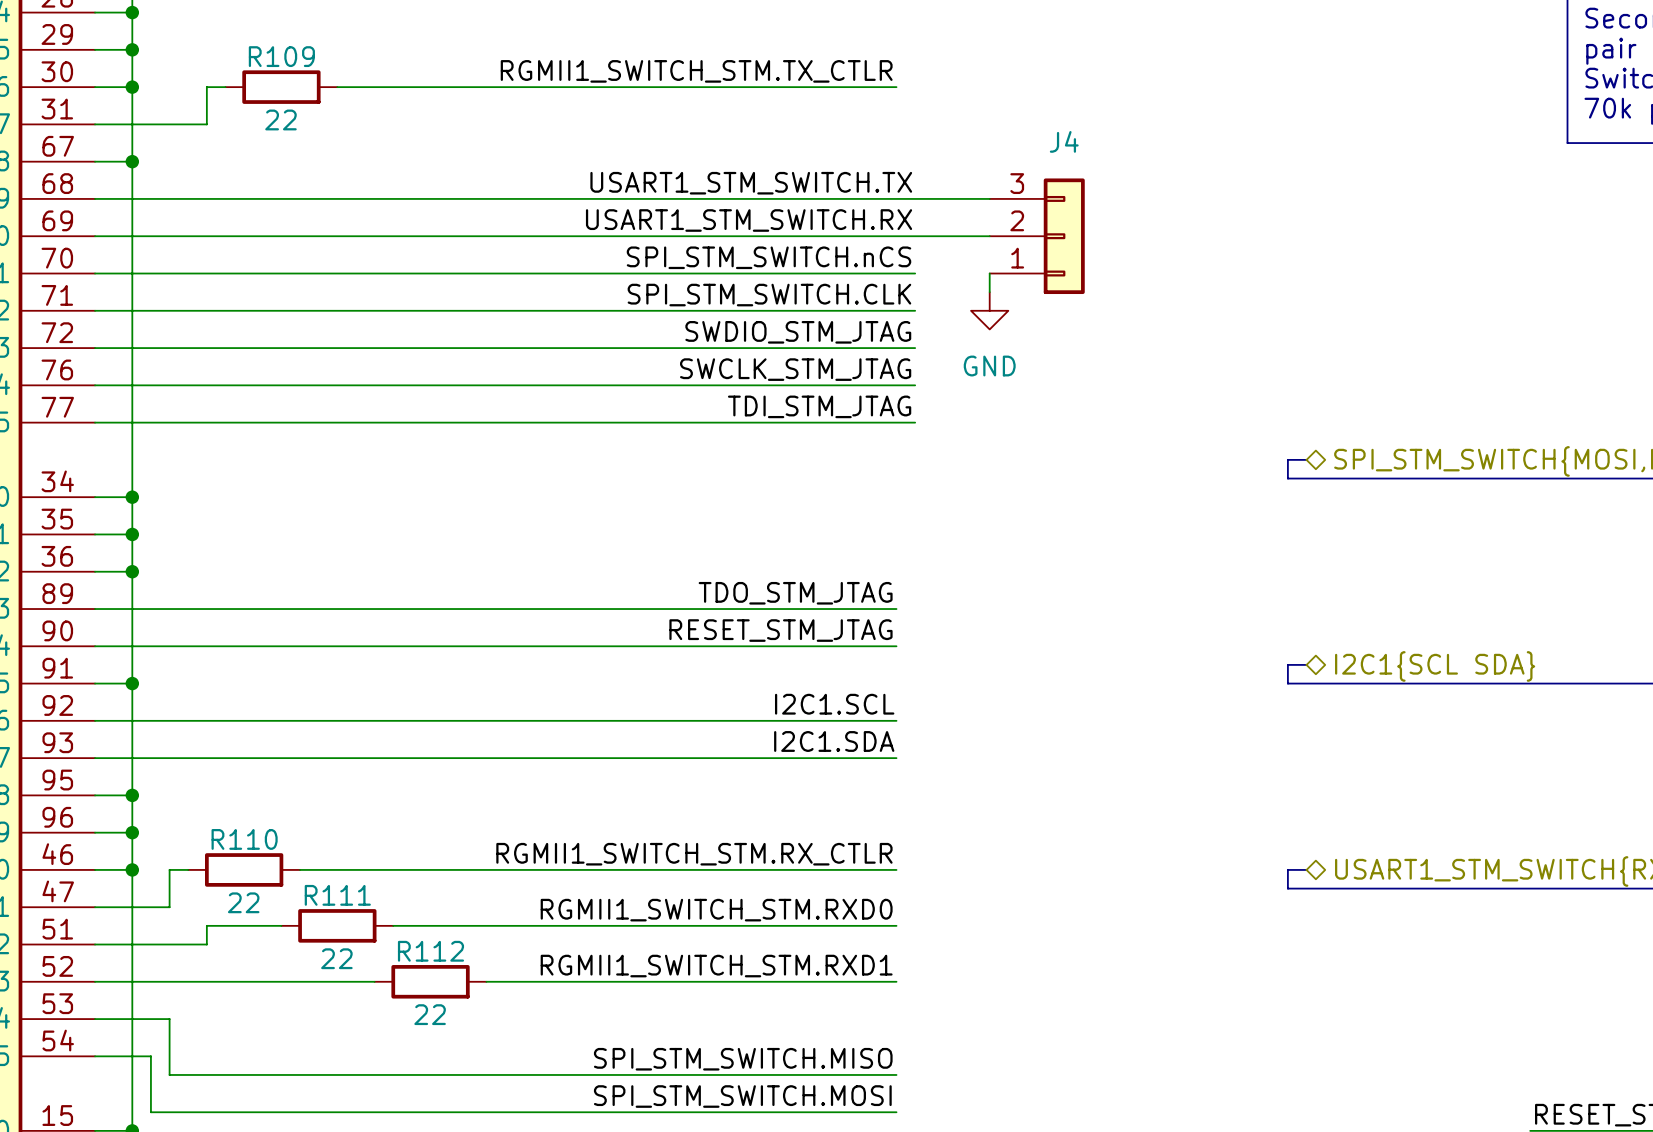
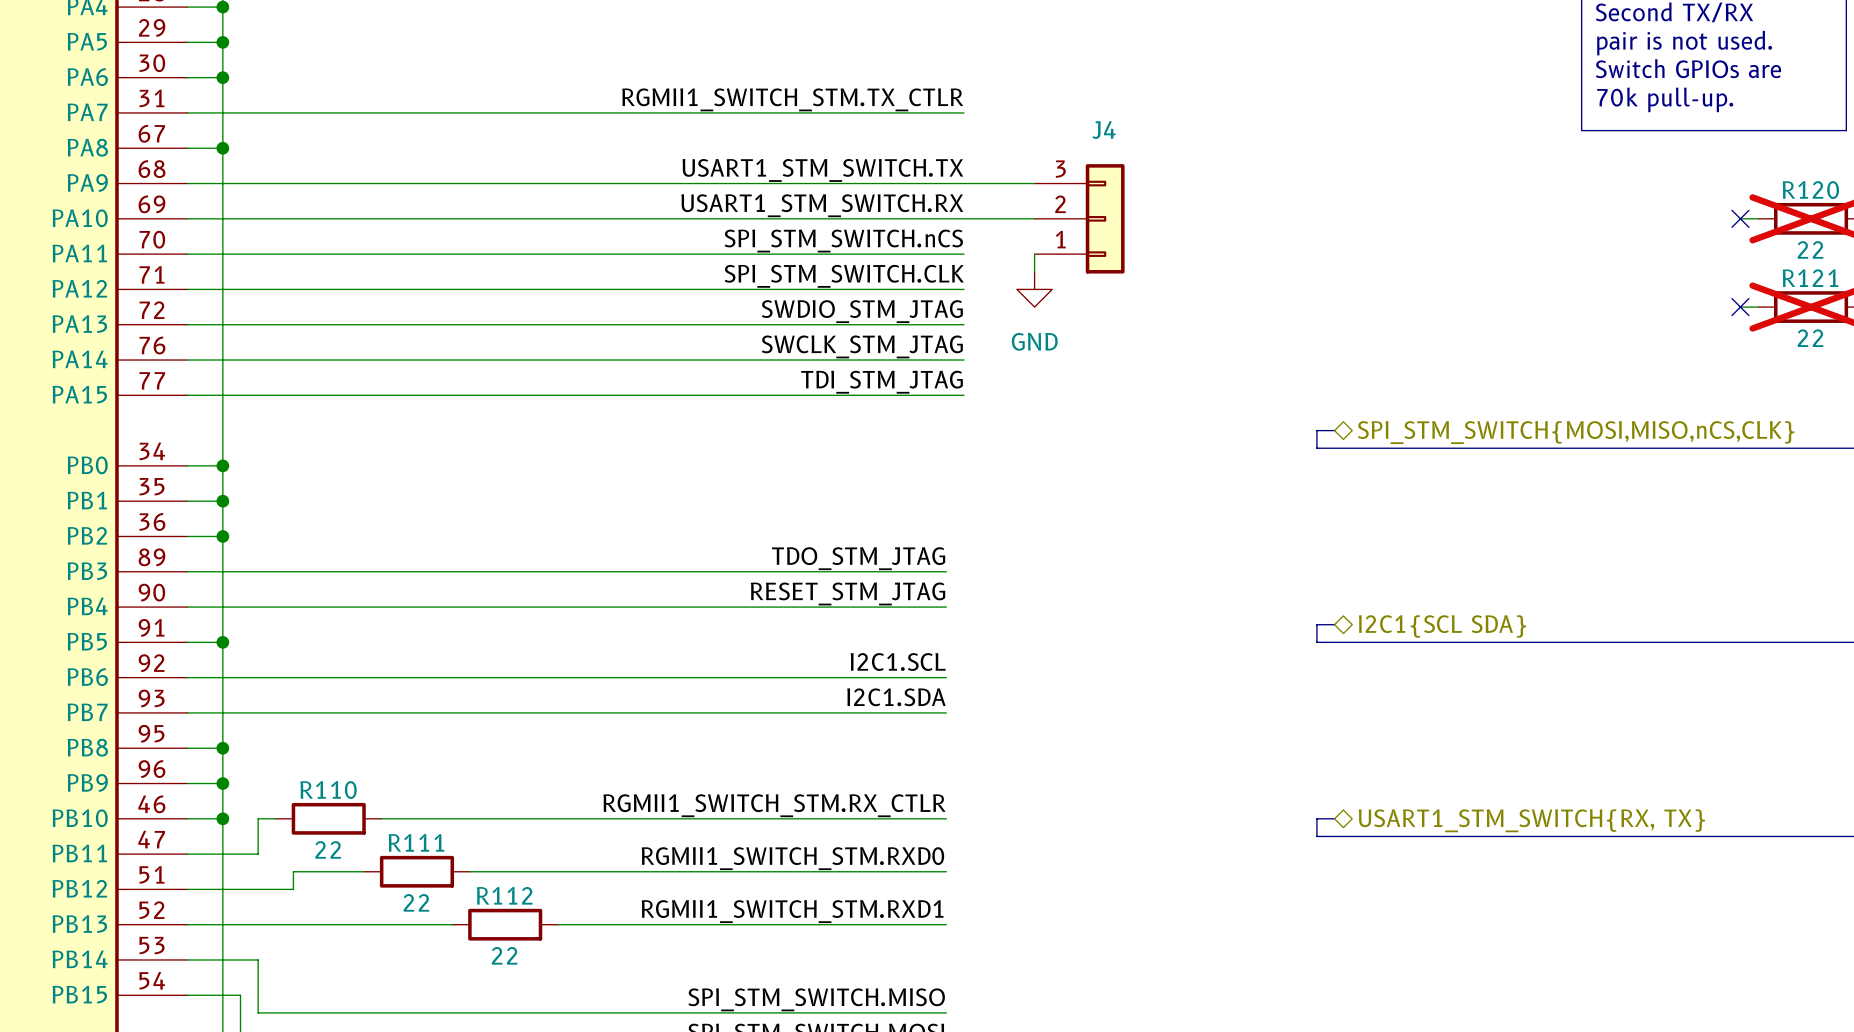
label position: RGMII1_SWITCH_STM.TX_CTLR (696, 71) -> RGMII1_SWITCH_STM.TX_CTLR (792, 99)
wire: (225, 87) (206, 87) (206, 124) -> (964, 112) (293, 112)
R109: 22 (281, 87) -> none
wire: (337, 87) (896, 87) -> none

